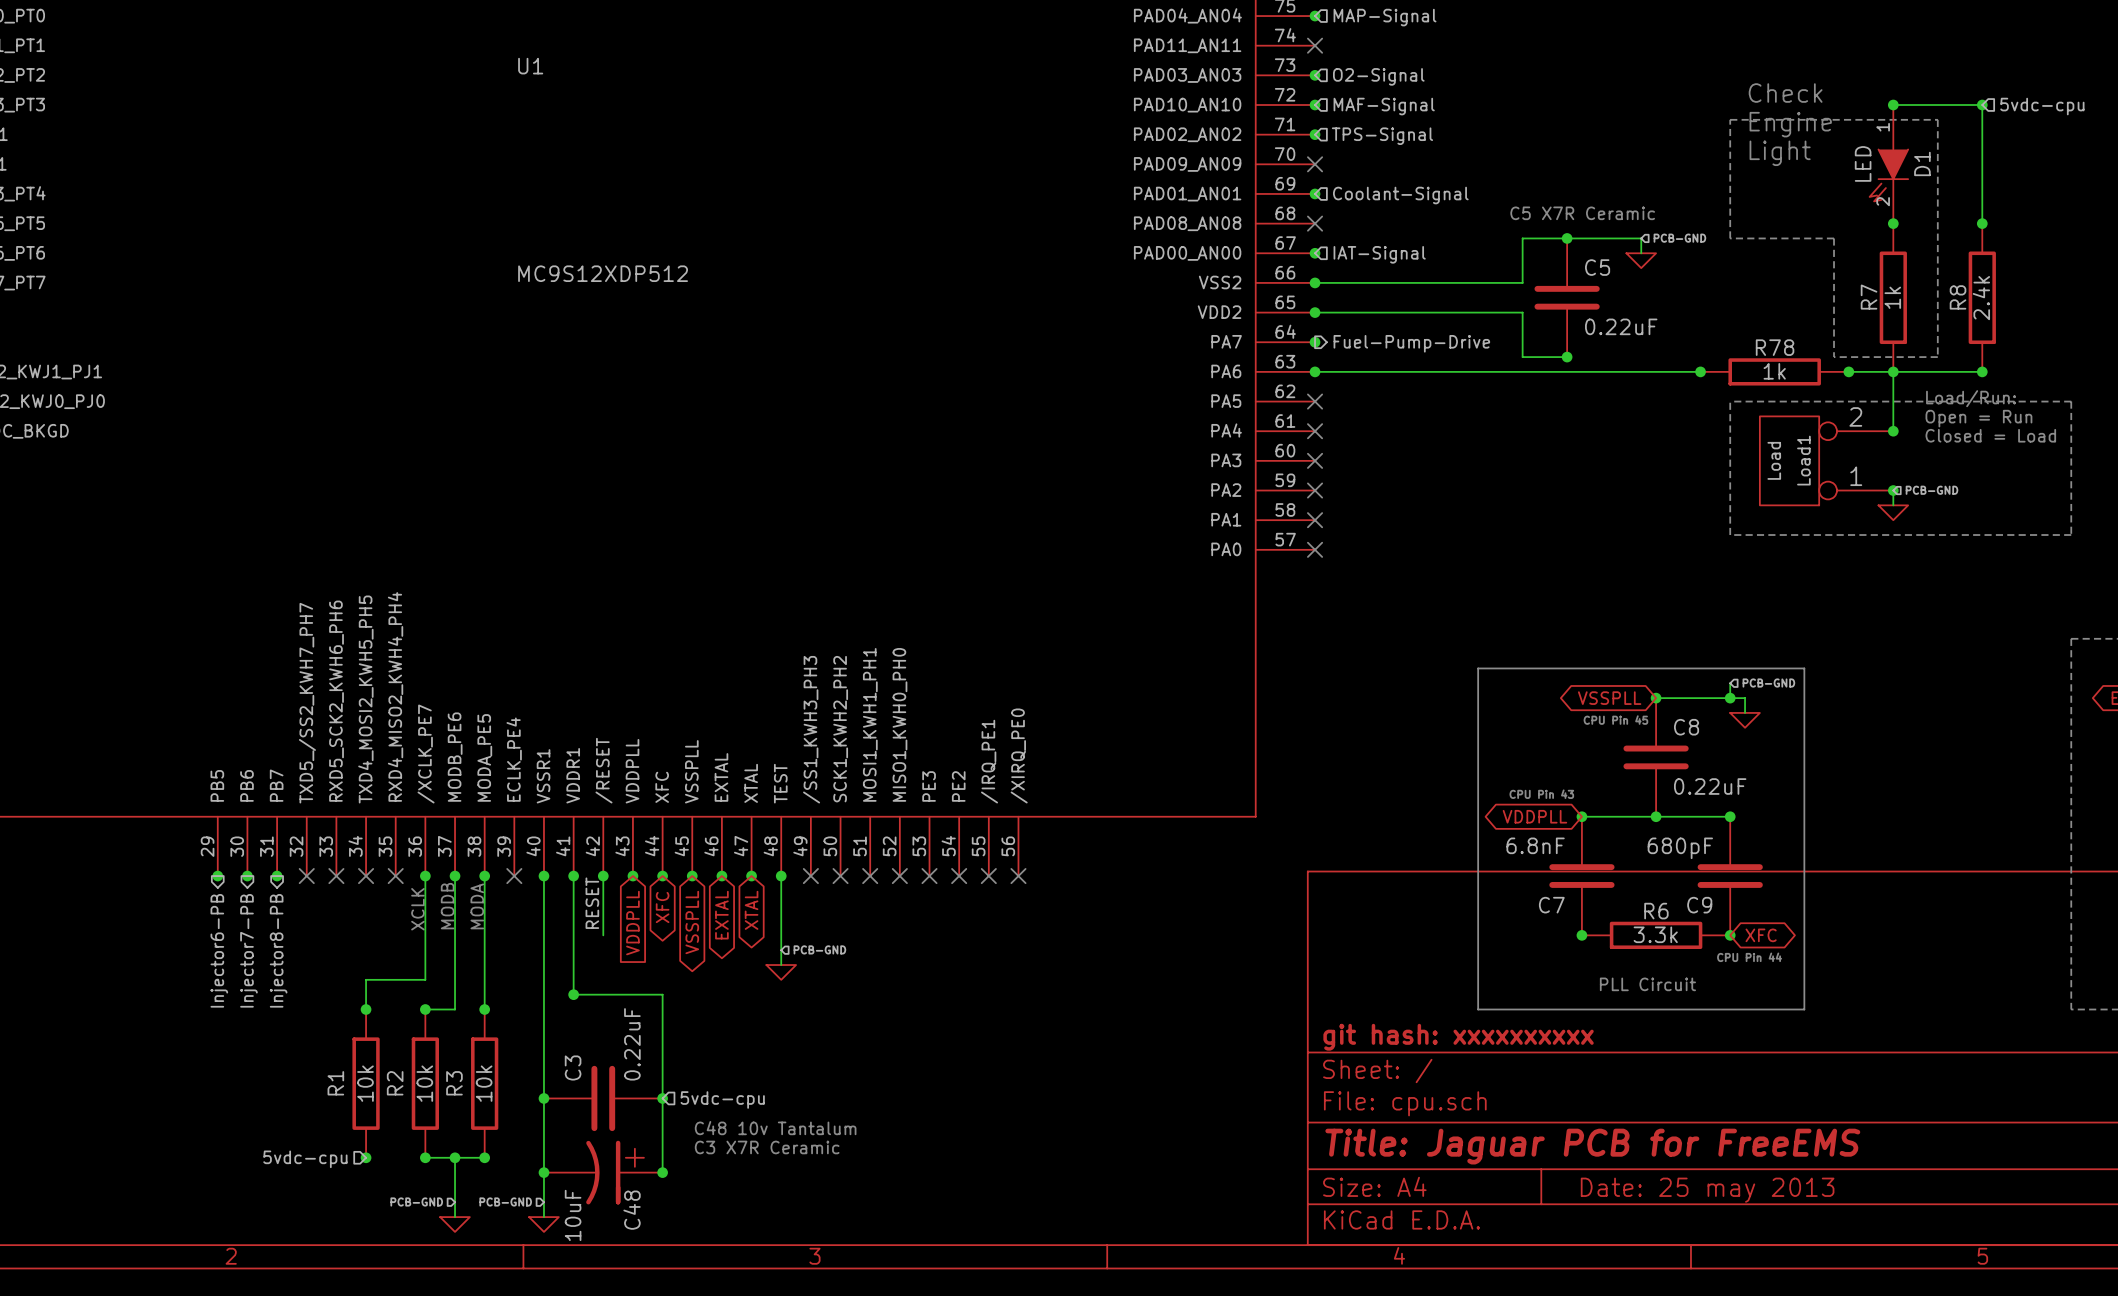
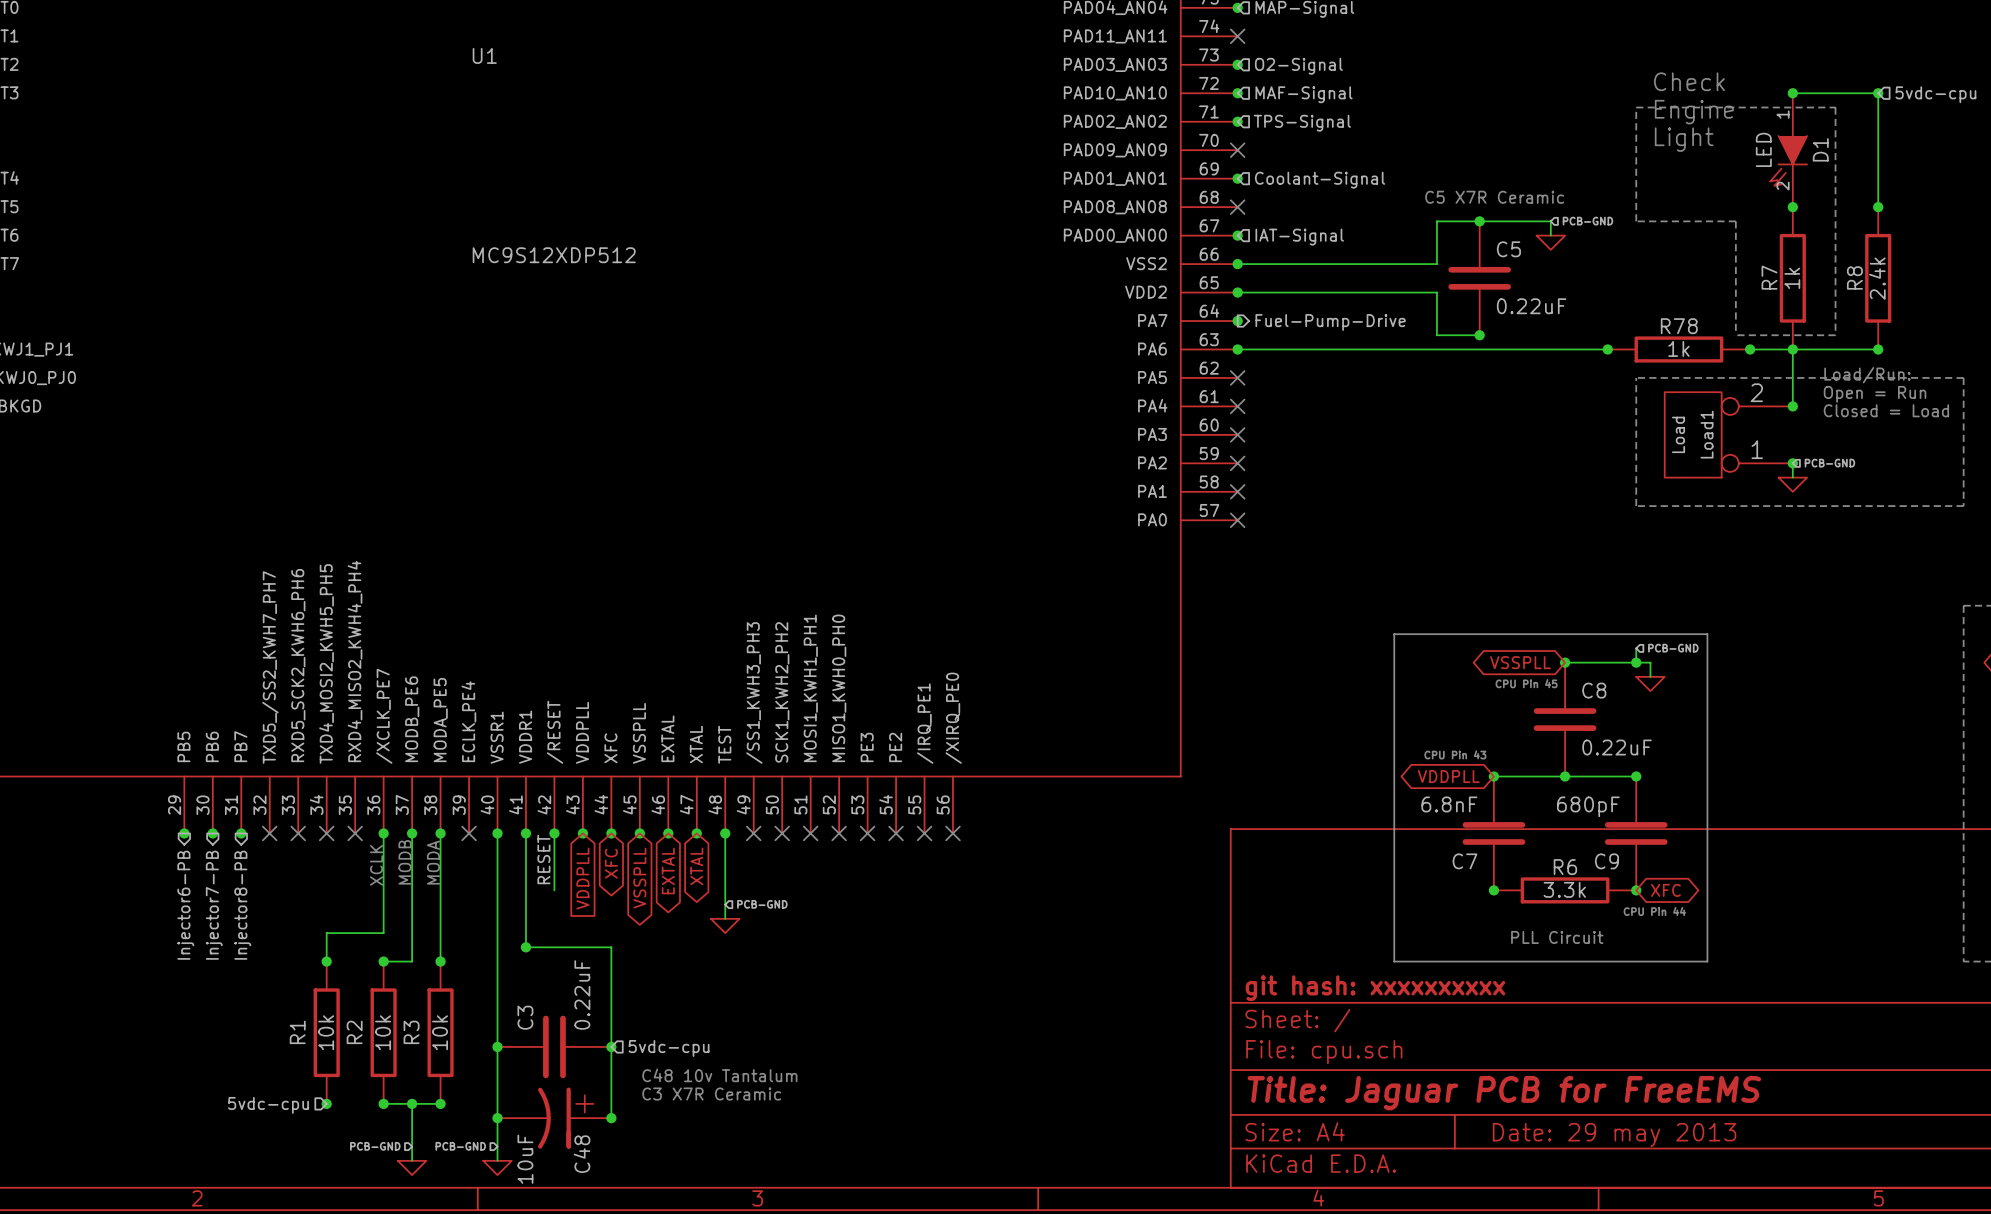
title block: Date: 25 may 2013 (1707, 1190) -> Date: 29 may 2013 (1614, 1135)

